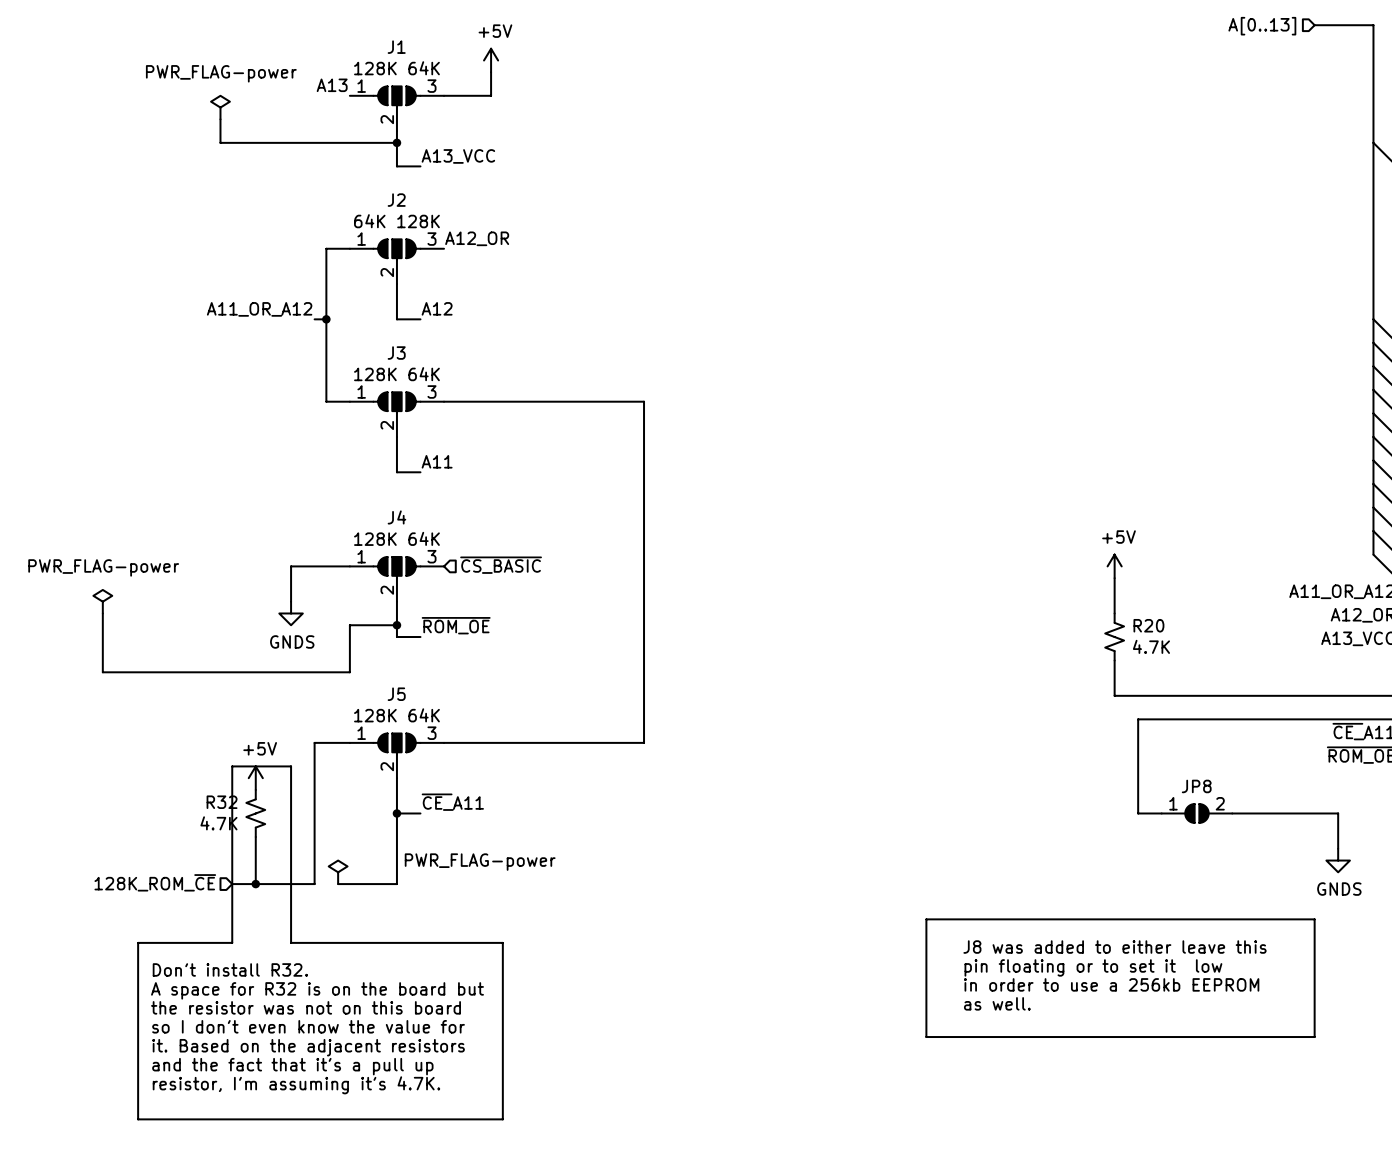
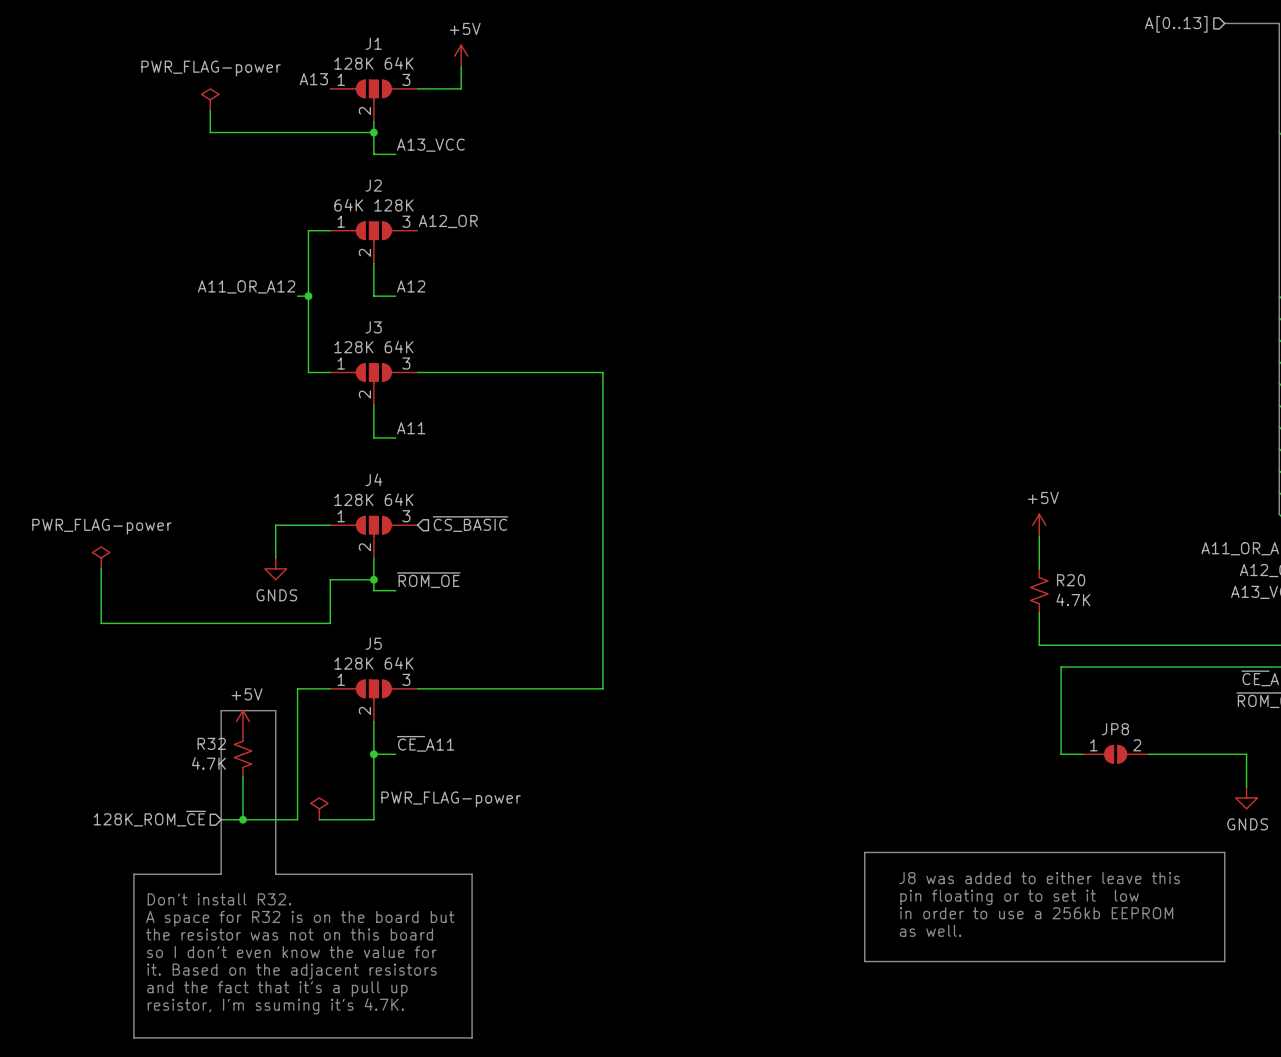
text: resistor, I'm assuming it's 4.7K. (296, 1085) -> resistor, I'm ssuming it's 4.7K. (275, 1006)

